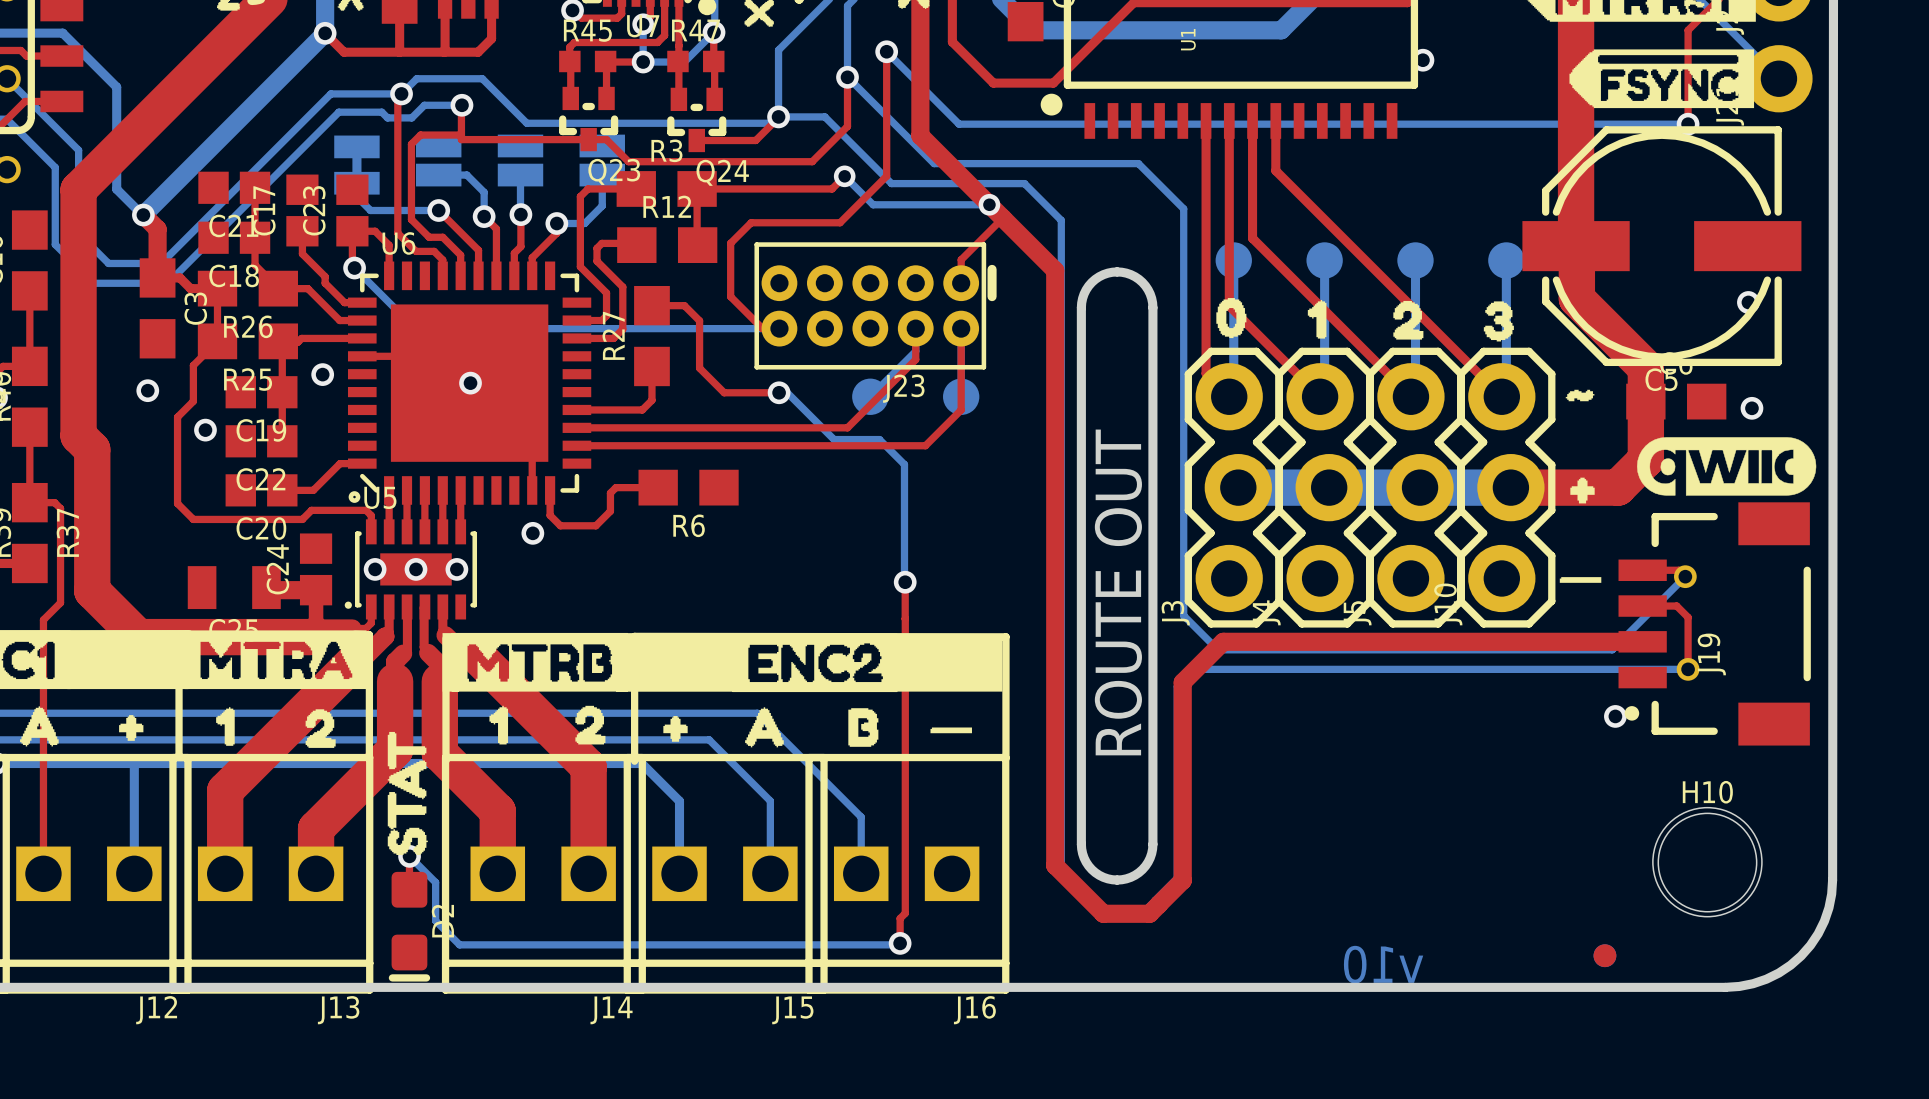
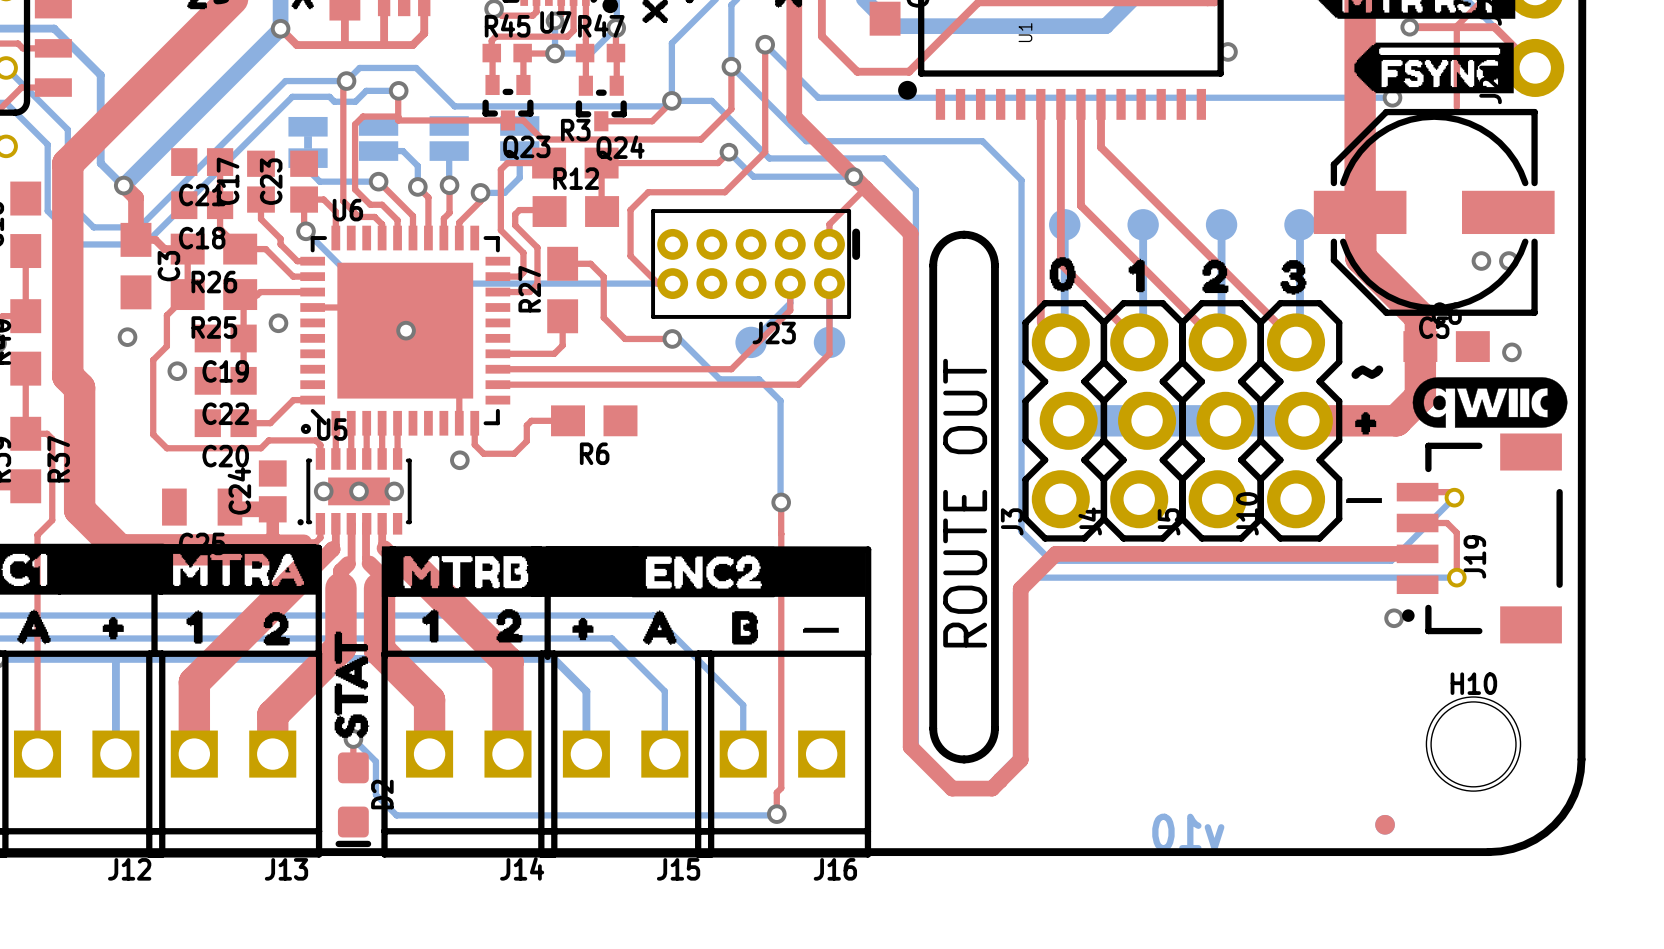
top track: none -> (1409, 27) (1494, 27) (1535, 67)
via: none -> (1409, 27)
bottom track: (948, 113) (959, 124) (1688, 124) -> (818, 97) (1392, 97)
via position: (1688, 124) -> (1392, 97)
via: none -> (1481, 261)
drawing: [1565, 389, 1595, 402] -> none
text: none -> ~ (1367, 372)

